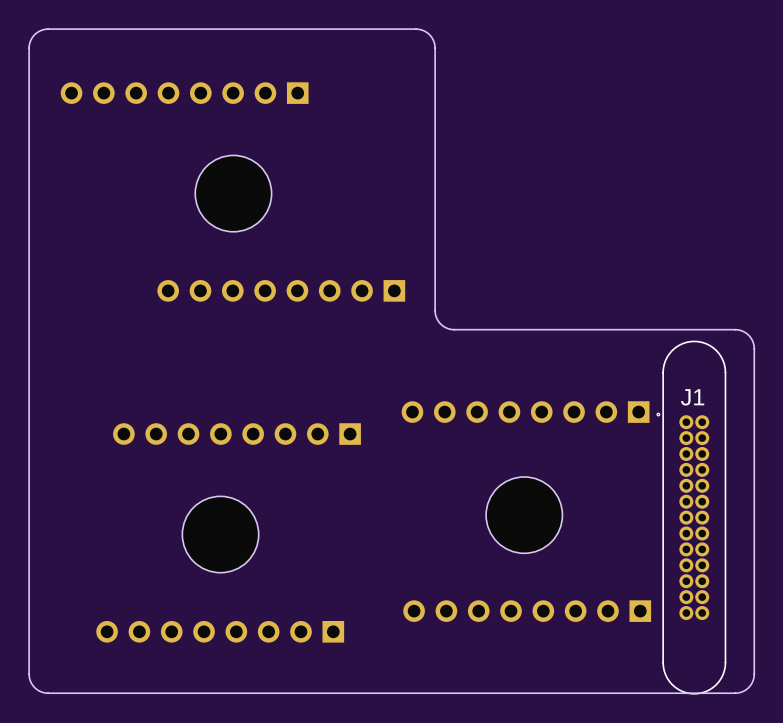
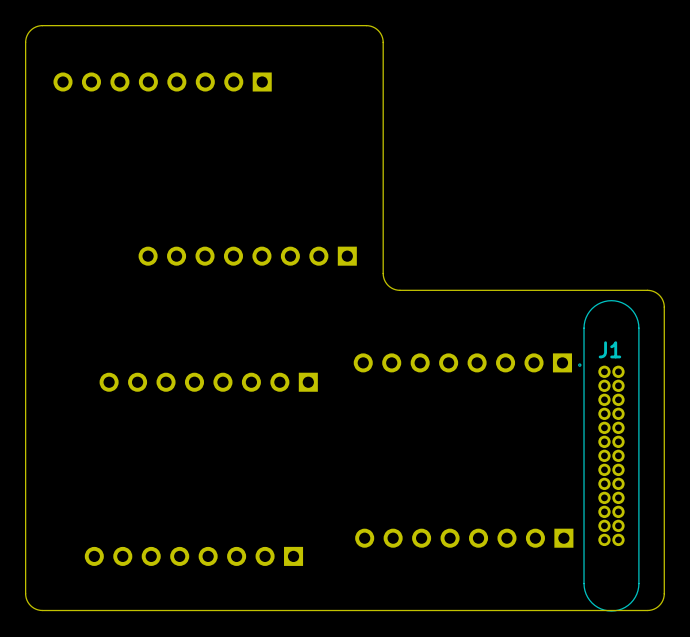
part: (233, 193) -> none
part: (524, 515) -> none
part: (220, 534) -> none

